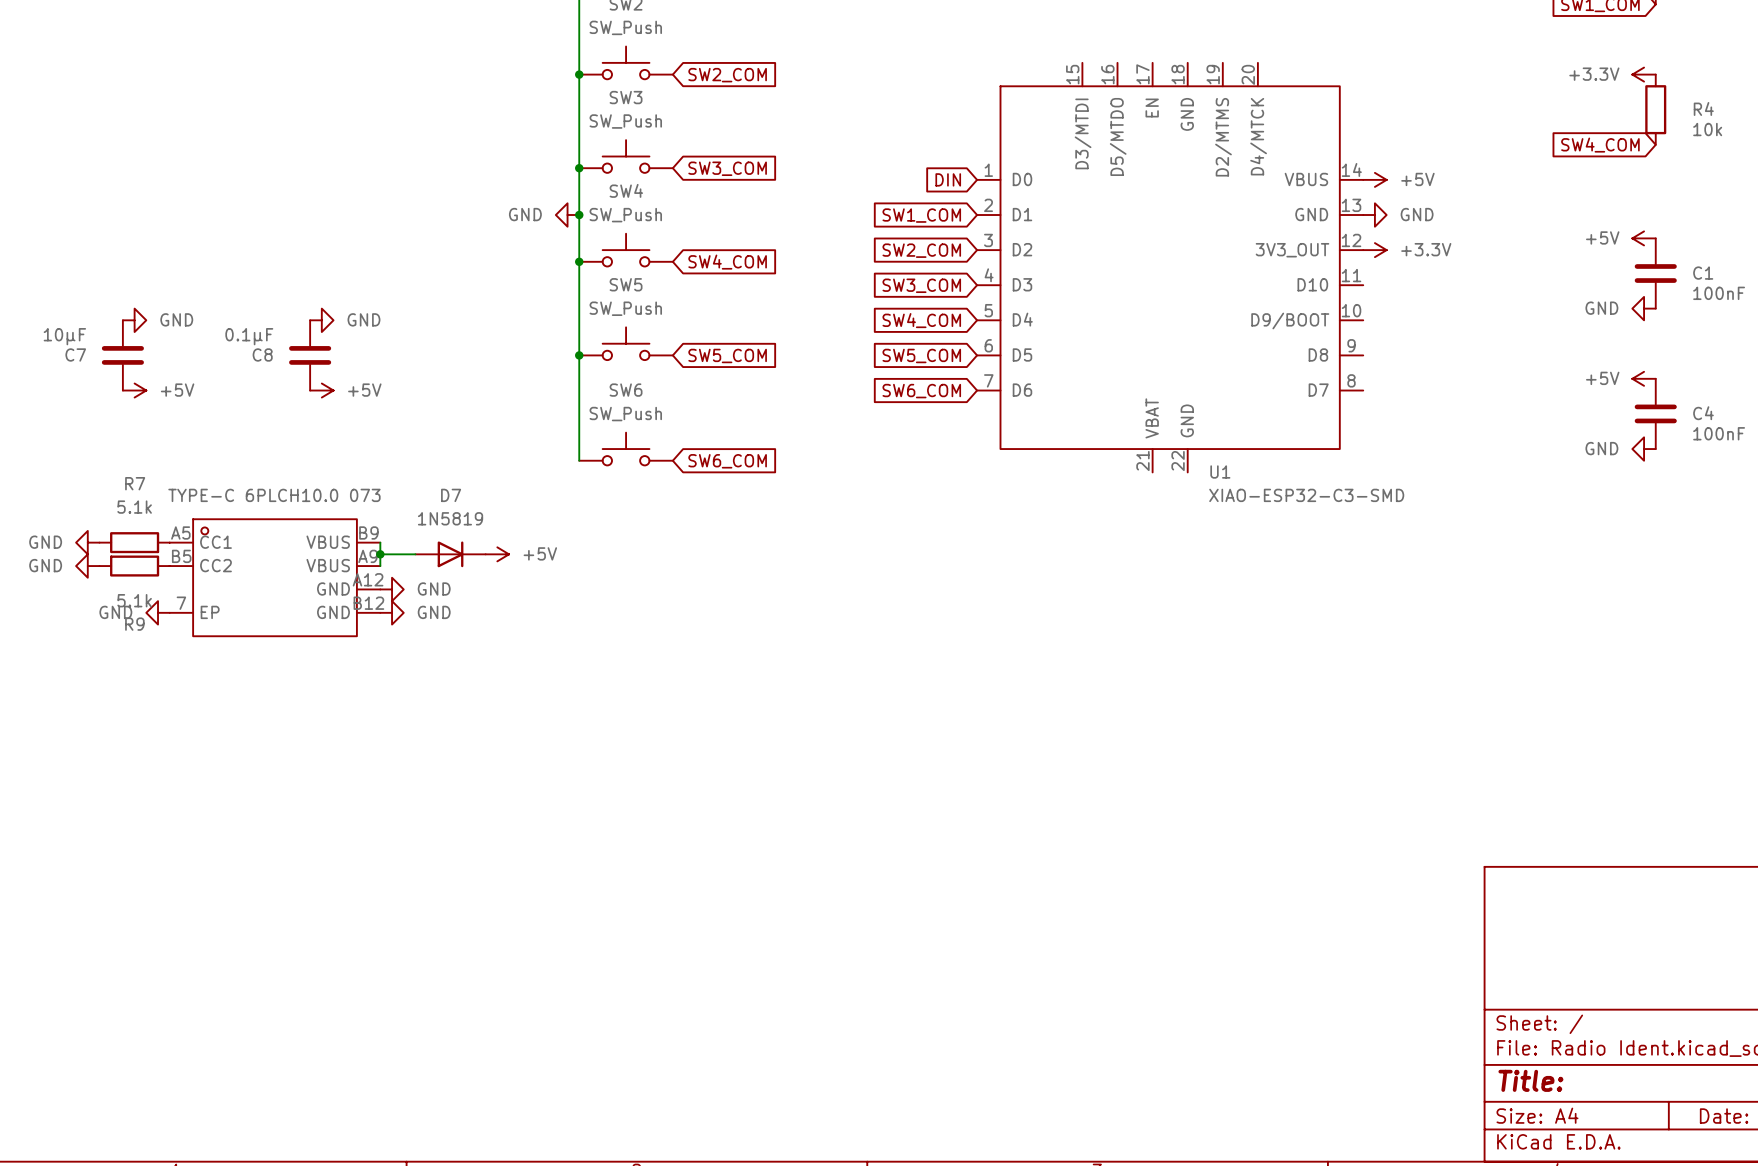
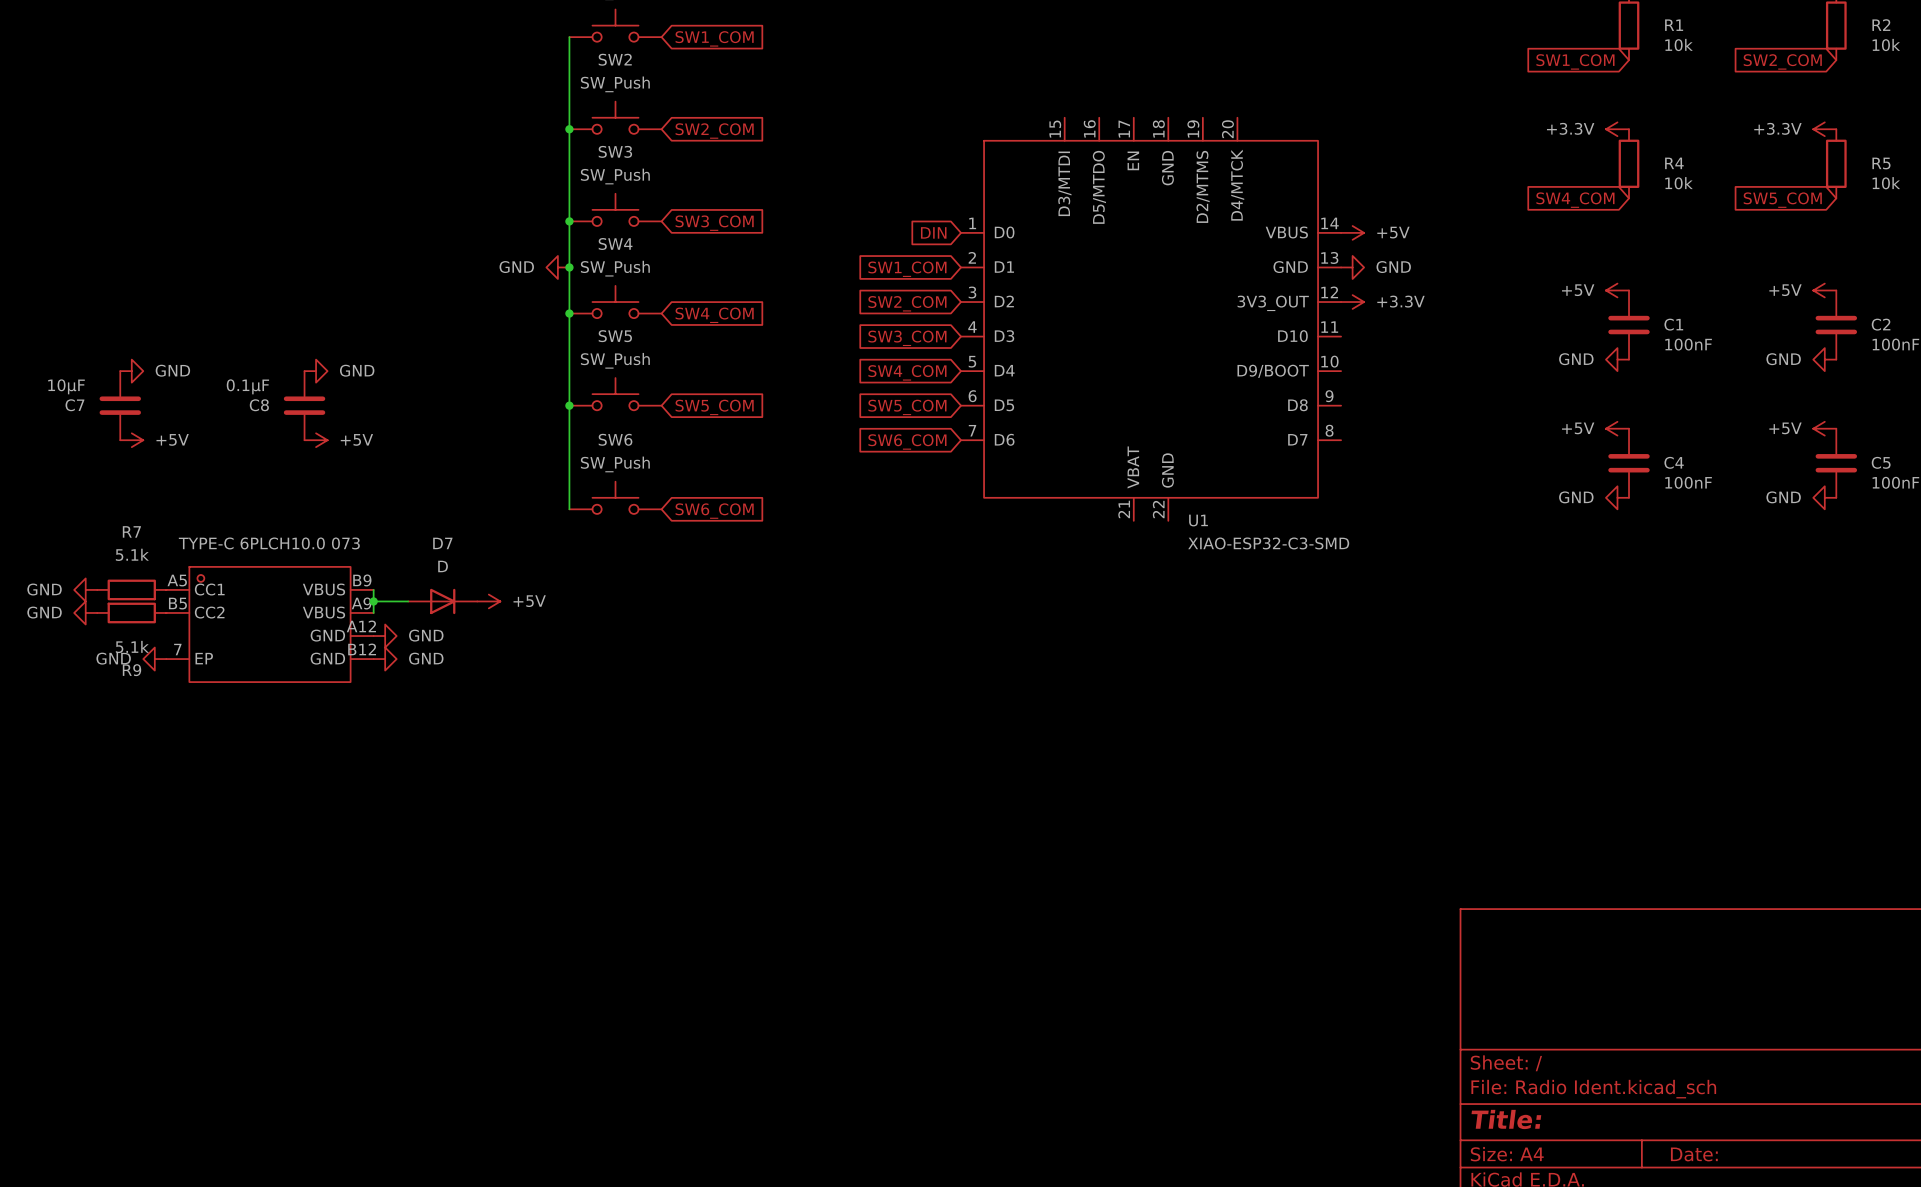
D7 value: 1N5819 (450, 518) -> D (443, 566)

